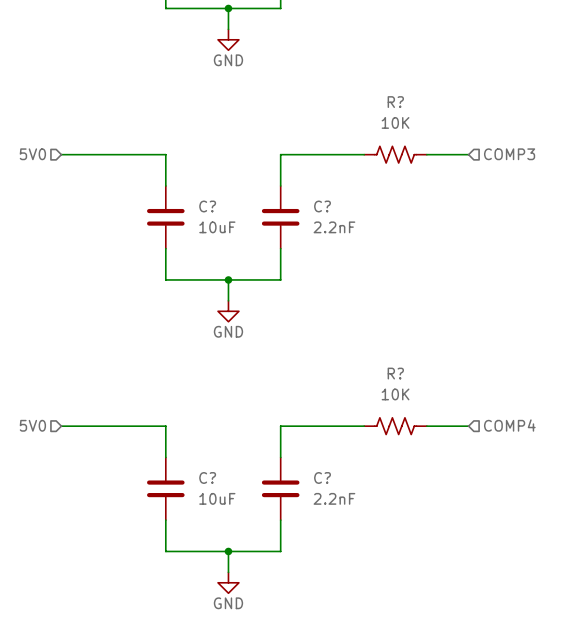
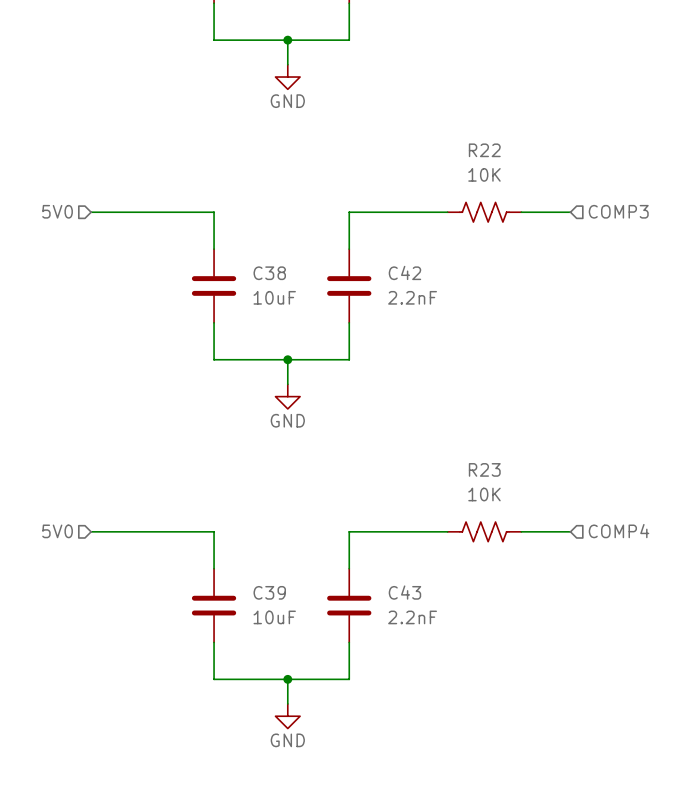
R? name: R? (395, 102) -> R22 (484, 150)
C? name: C? (207, 206) -> C38 (269, 273)
C? name: C? (322, 206) -> C42 (404, 272)
R? name: R? (395, 373) -> R23 (484, 469)
C? name: C? (207, 477) -> C39 (269, 592)
C? name: C? (322, 477) -> C43 (404, 592)

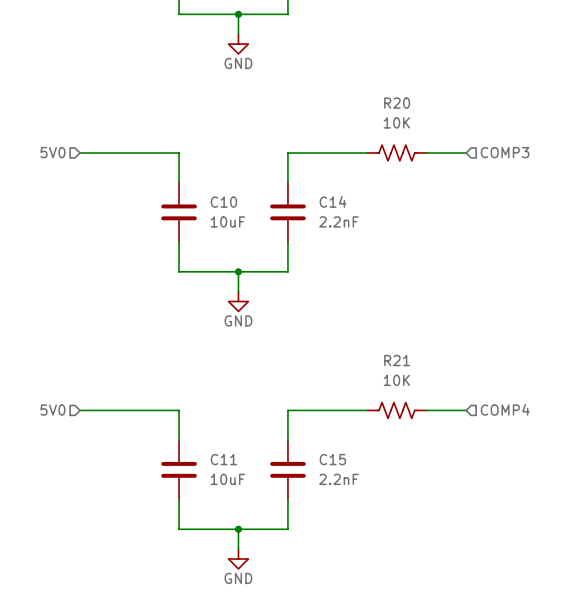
R22 name: R22 (484, 150) -> R20 (397, 103)
C42 name: C42 (404, 272) -> C14 (333, 201)
C38 name: C38 (269, 273) -> C10 (223, 202)
R23 name: R23 (484, 469) -> R21 (397, 360)
C39 name: C39 (269, 592) -> C11 (223, 459)
C43 name: C43 (404, 592) -> C15 (332, 459)

